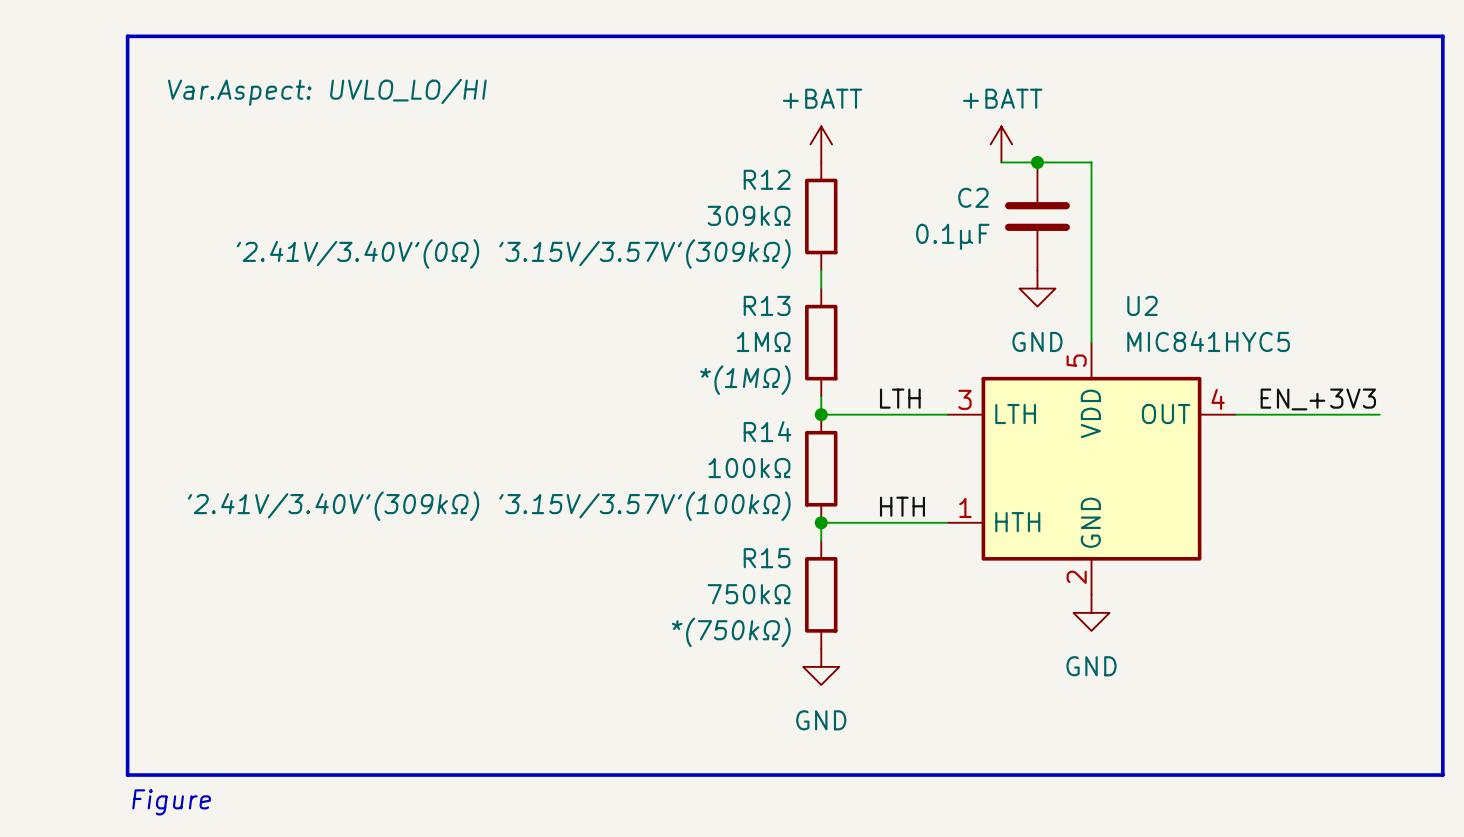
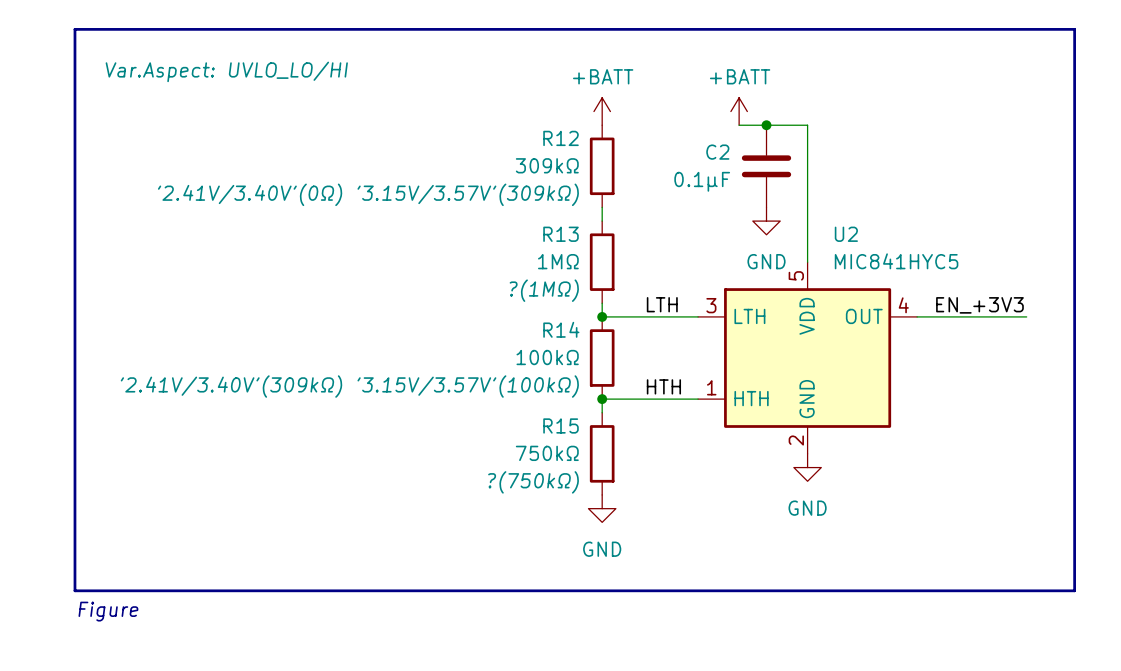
R13 text: *(1MΩ) (745, 380) -> ?(1MΩ) (544, 290)
R15 text: *(750kΩ) (731, 632) -> ?(750kΩ) (533, 482)

